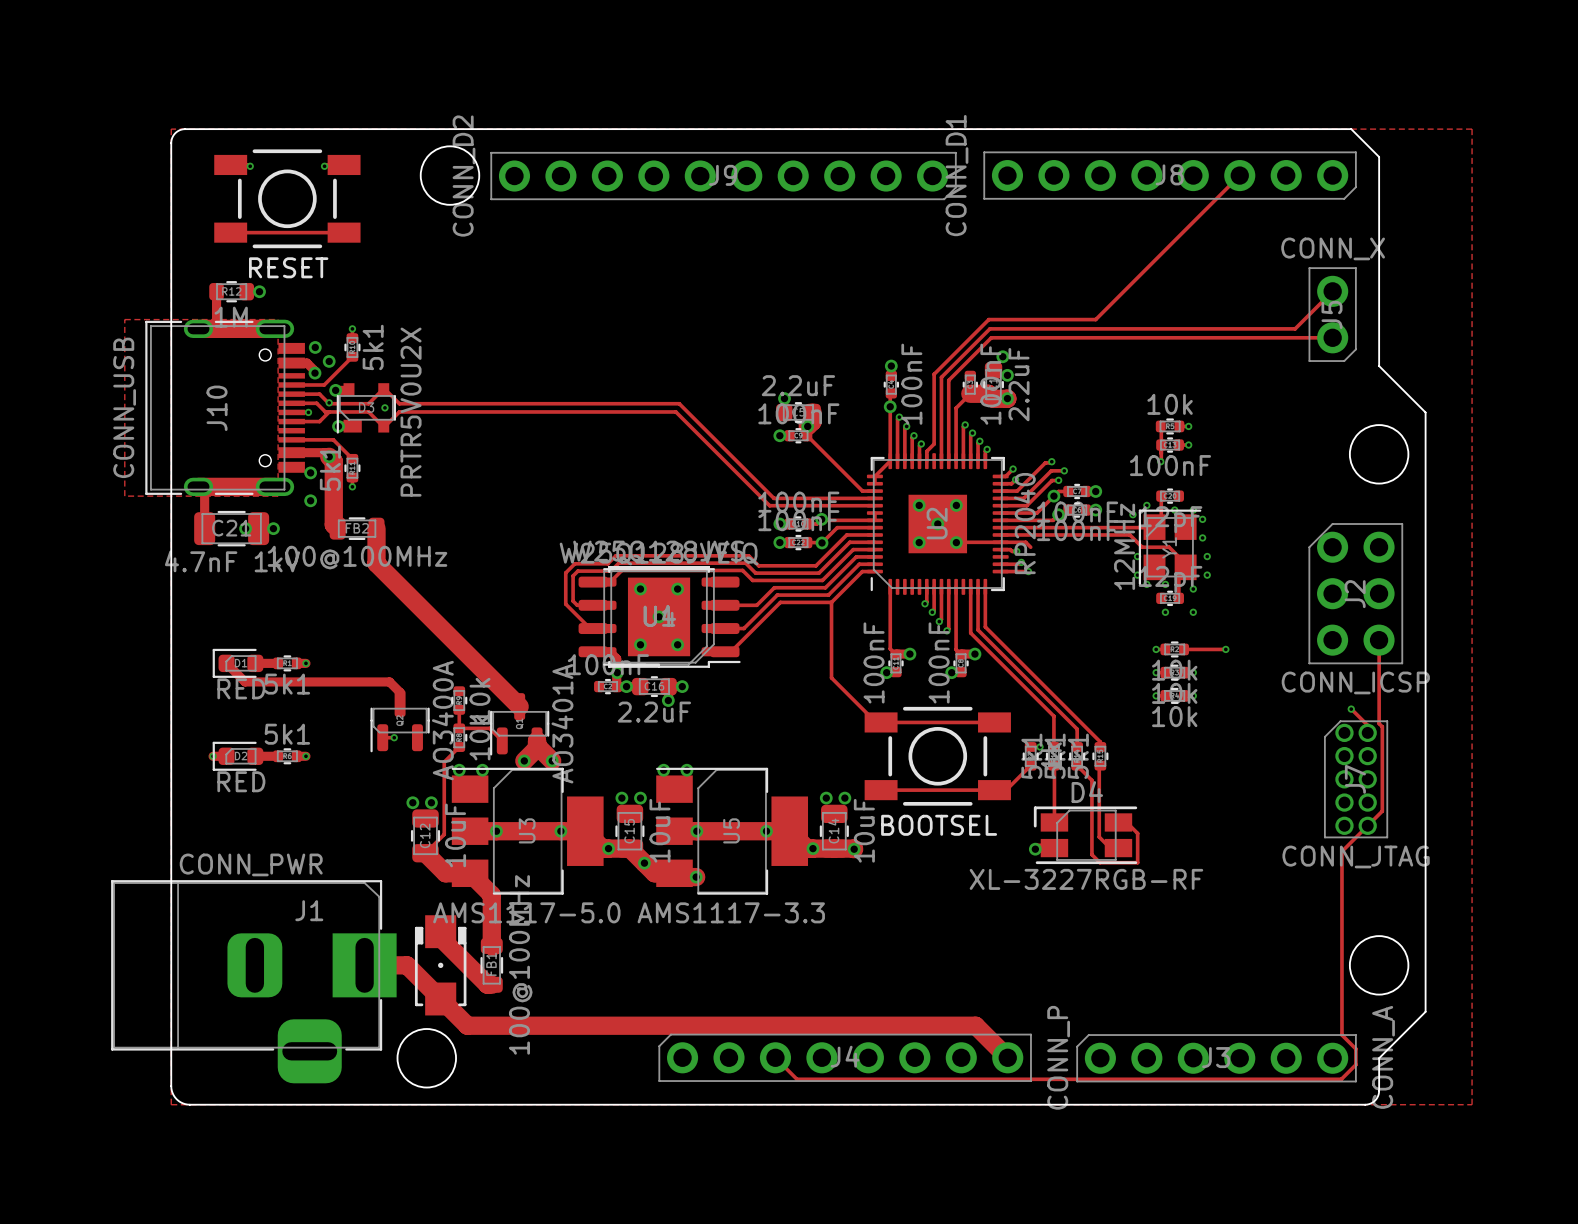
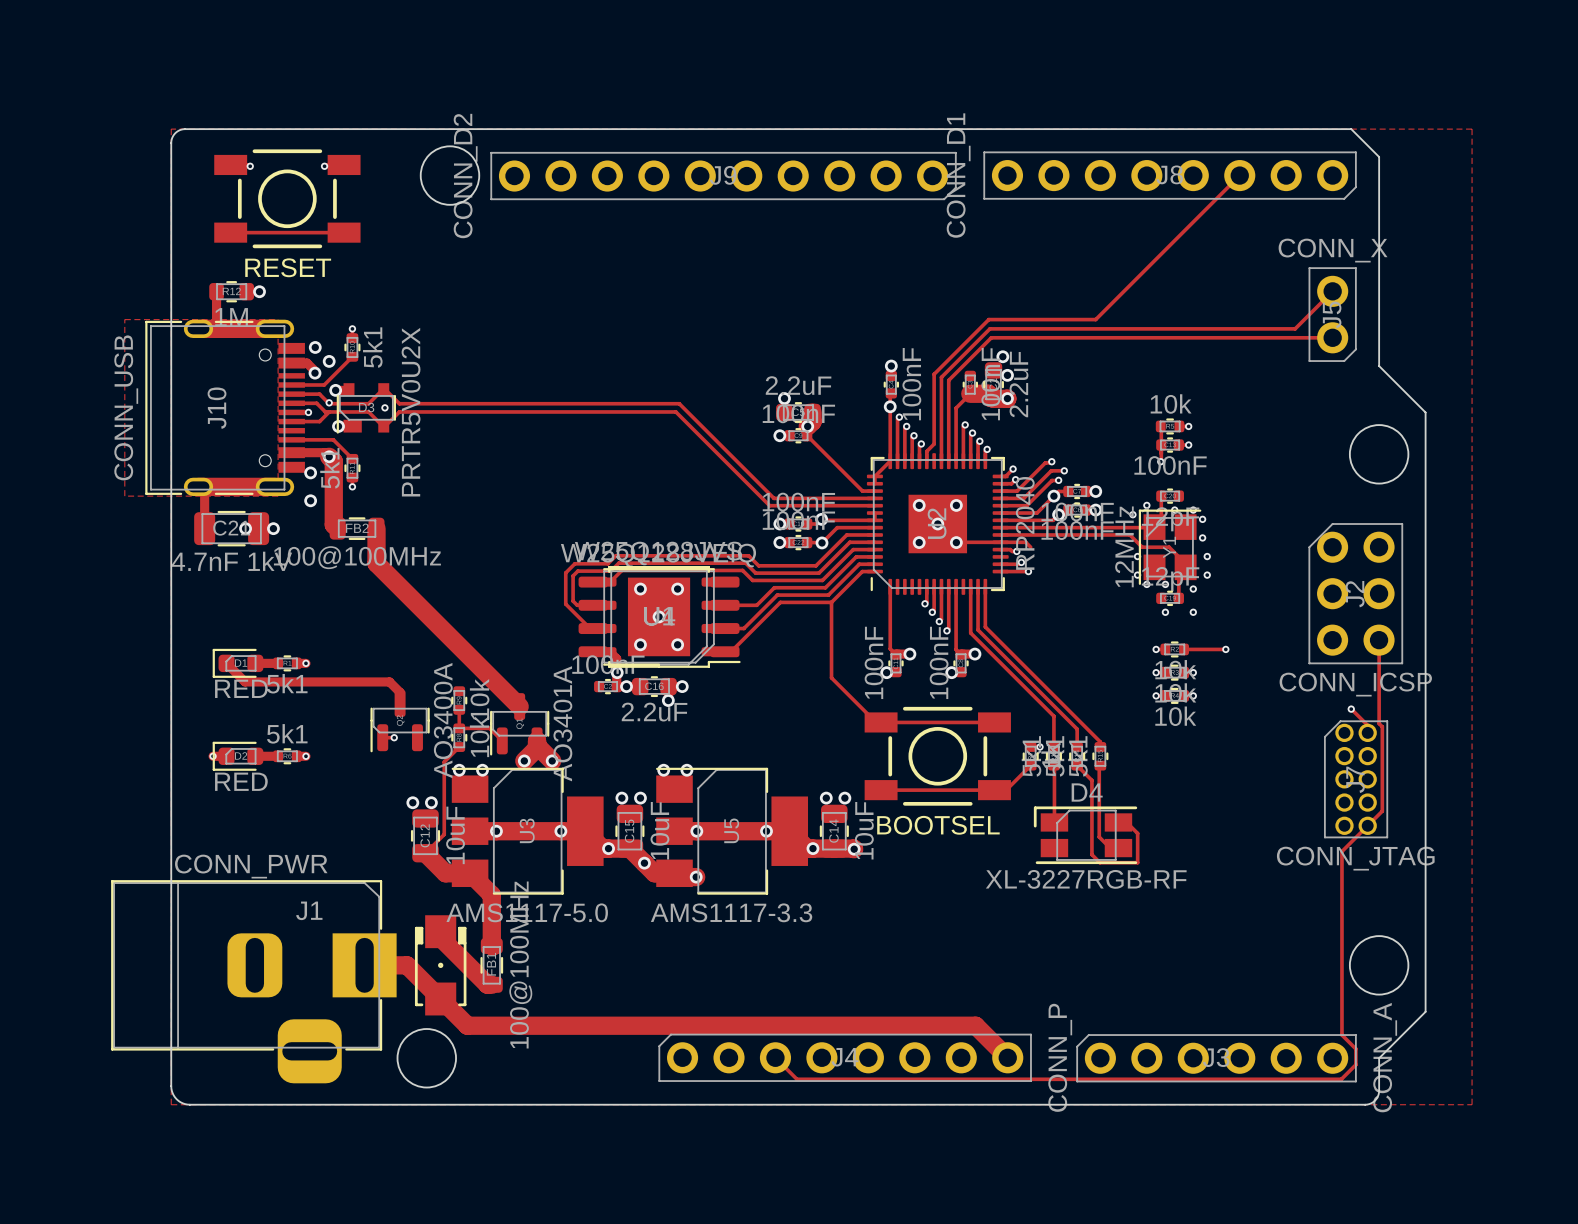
via: (1035, 849) -> none

